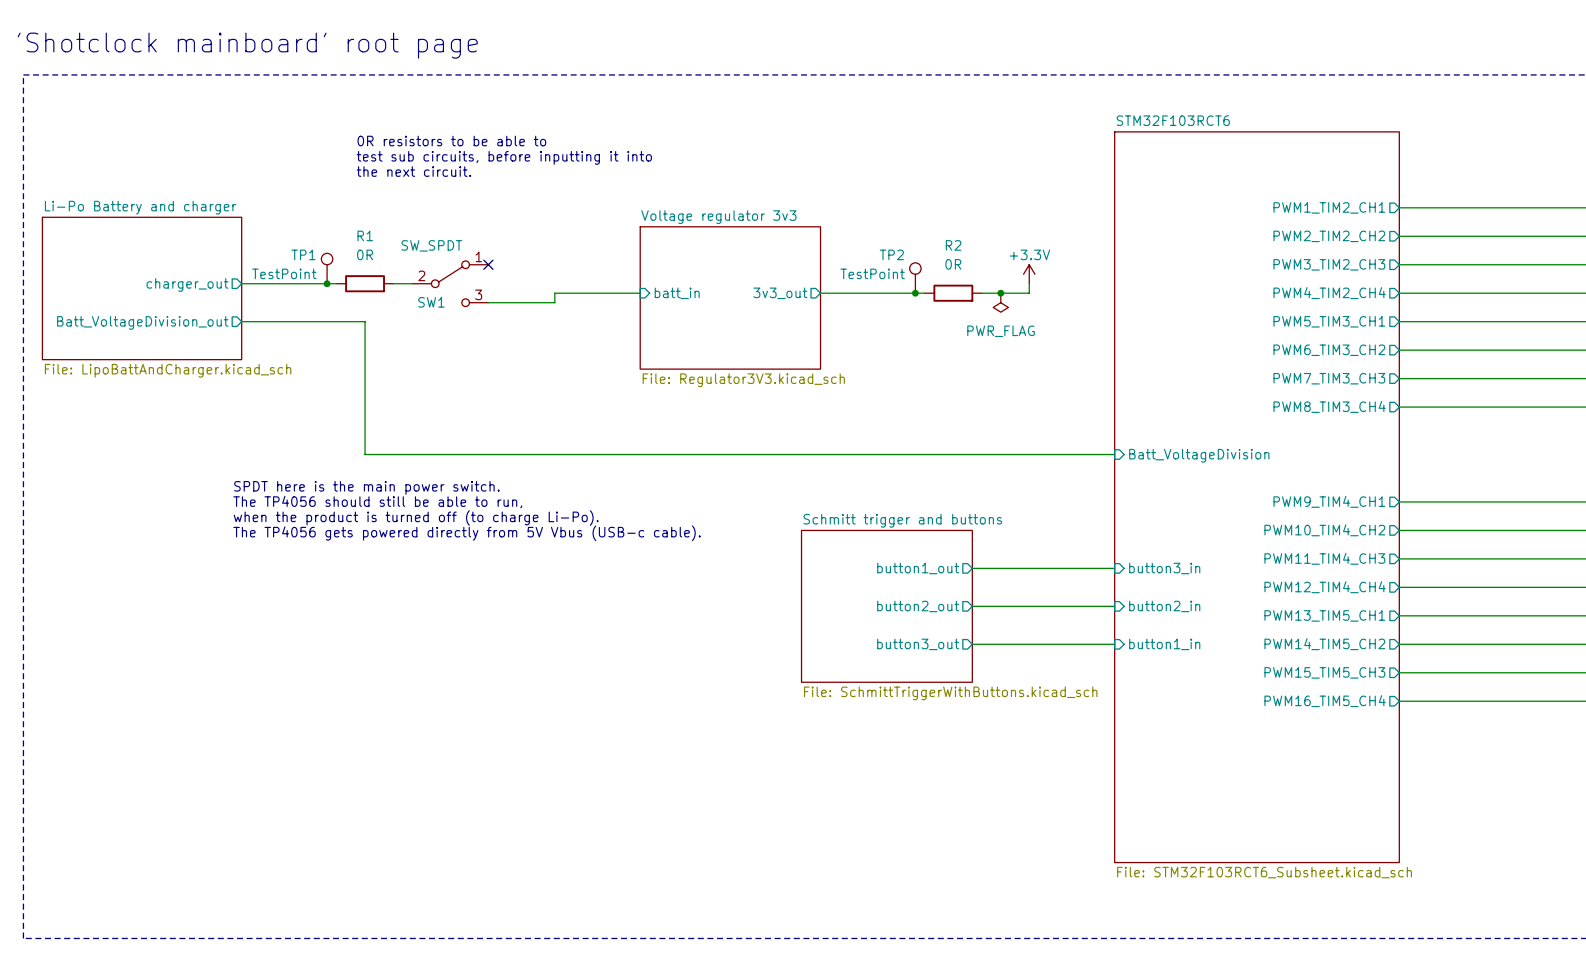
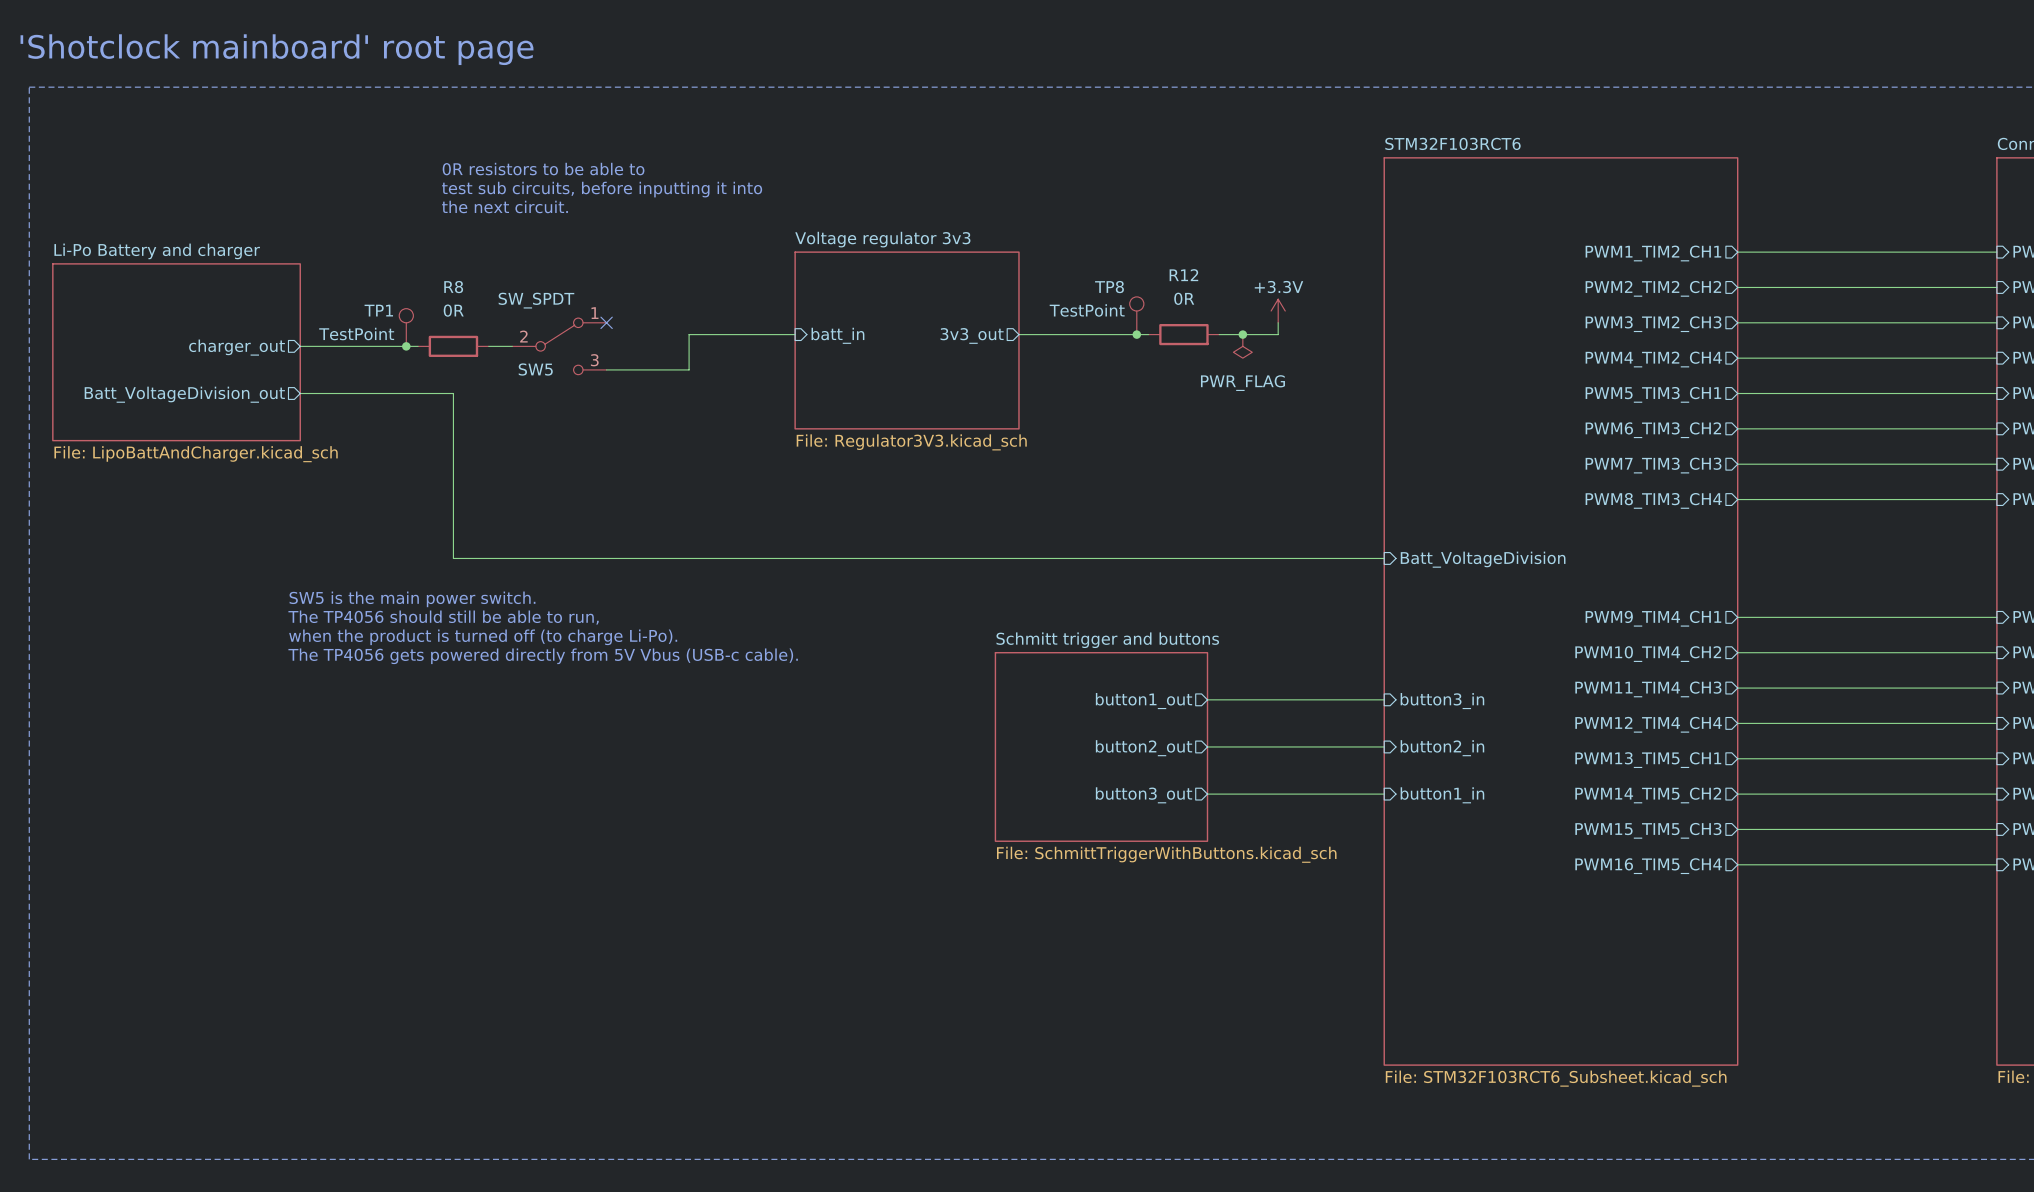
R1 name: R1 (365, 235) -> R8 (453, 287)
TP8: none -> TestPoint (1136, 315)
R12: none -> 0R (1183, 334)
power symbol position: +3.3V (1029, 274) -> +3.3V (1278, 311)
TP2: TestPoint (915, 278) -> none
wire: (1029, 283) (1029, 293) (981, 293) -> (1278, 322) (1278, 334) (1219, 334)
wire: (554, 293) (640, 293) -> (689, 358) (689, 334) (795, 334)
sheet pin position: batt_in (677, 293) -> batt_in (837, 335)
sheet pin position: 3v3_out (780, 293) -> 3v3_out (972, 335)
wire: (820, 293) (924, 293) -> (1018, 334) (1148, 334)
junction position: (915, 293) -> (1136, 334)
R2: 0R (953, 293) -> none
junction position: (1000, 293) -> (1242, 334)
sheet Voltage regulator 3v3 position: (730, 297) -> (907, 340)
SW1 name: SW1 (431, 302) -> SW5 (535, 369)
power symbol position: PWR_FLAG (1000, 302) -> PWR_FLAG (1242, 346)
text: SPDT here is the main power switch. (366, 487) -> SW5 is the main power switch. (412, 599)

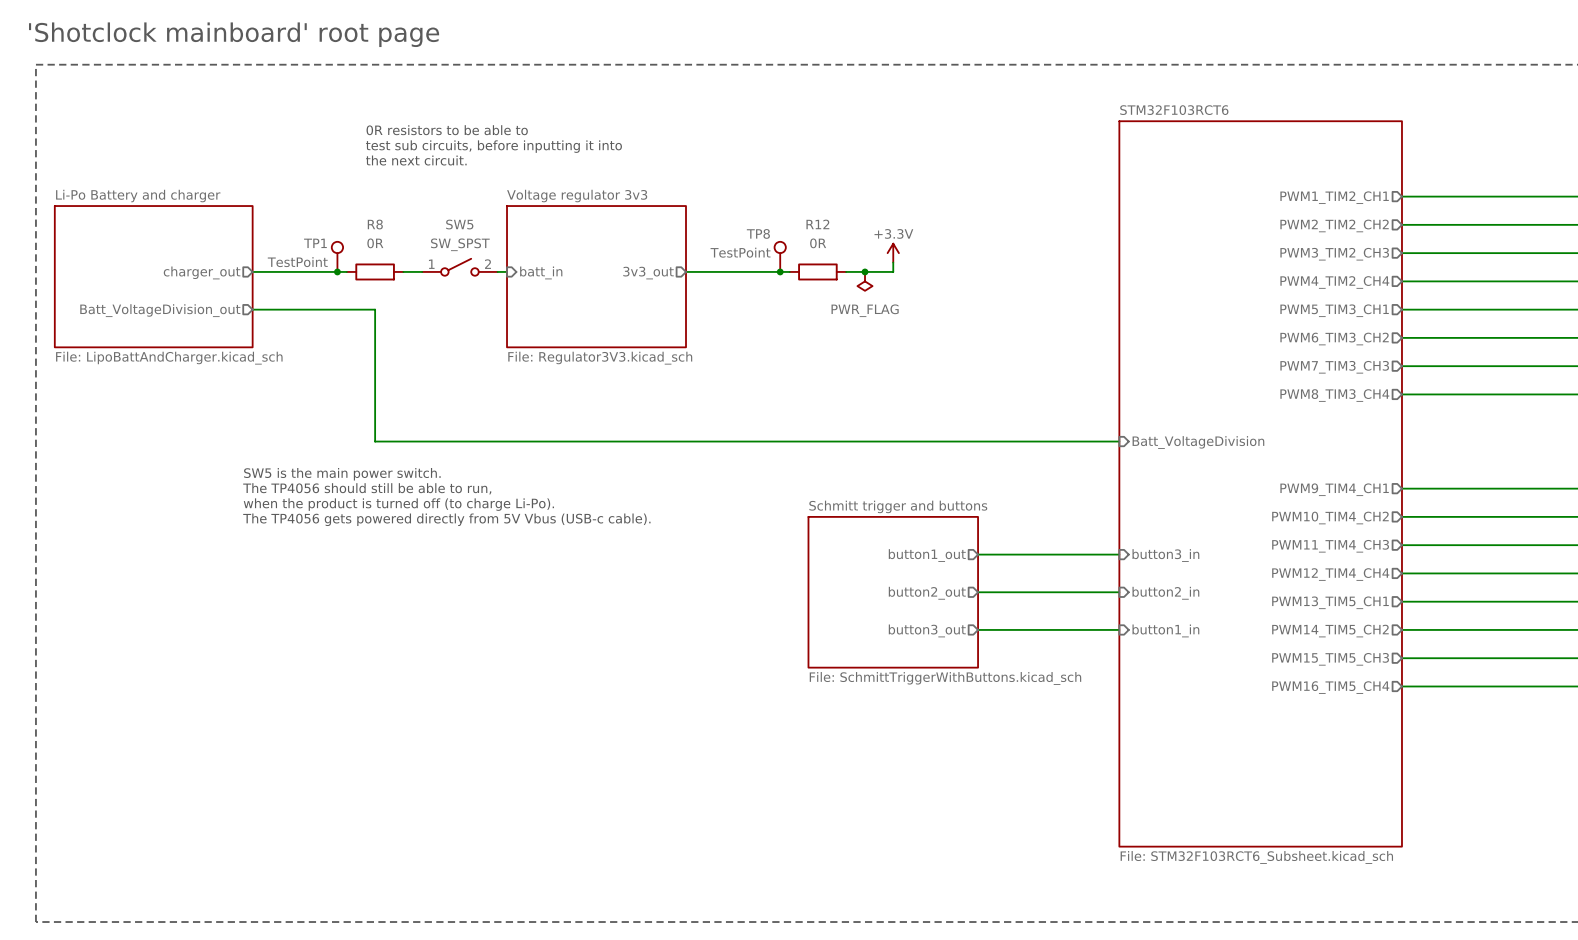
SW5 value: SW_SPDT (536, 300) -> SW_SPST (460, 244)
power symbol position: +3.3V (1278, 311) -> +3.3V (893, 253)
TP8 position: (1136, 315) -> (780, 256)
SW5 symbol: [512, 318, 607, 375] -> [422, 258, 498, 276]
no-connect mark: (606, 322) -> none
wire: (1278, 322) (1278, 334) (1219, 334) -> (893, 262) (893, 271) (846, 271)
wire: (795, 334) (689, 334) (689, 369) (606, 369) -> none
wire: (1018, 334) (1148, 334) -> (686, 271) (789, 271)
junction: (1136, 334) -> none
R12 position: (1183, 334) -> (817, 271)
junction: (1242, 334) -> none
sheet pin position: batt_in (837, 335) -> batt_in (541, 272)
sheet pin position: 3v3_out (972, 335) -> 3v3_out (648, 273)
sheet Voltage regulator 3v3 position: (907, 340) -> (596, 276)
wire: none -> (497, 271) (507, 271)
junction: none -> (780, 271)
junction: none -> (865, 271)
power symbol position: PWR_FLAG (1242, 346) -> PWR_FLAG (865, 281)
SW5 name position: SW5 (535, 369) -> SW5 (459, 224)

